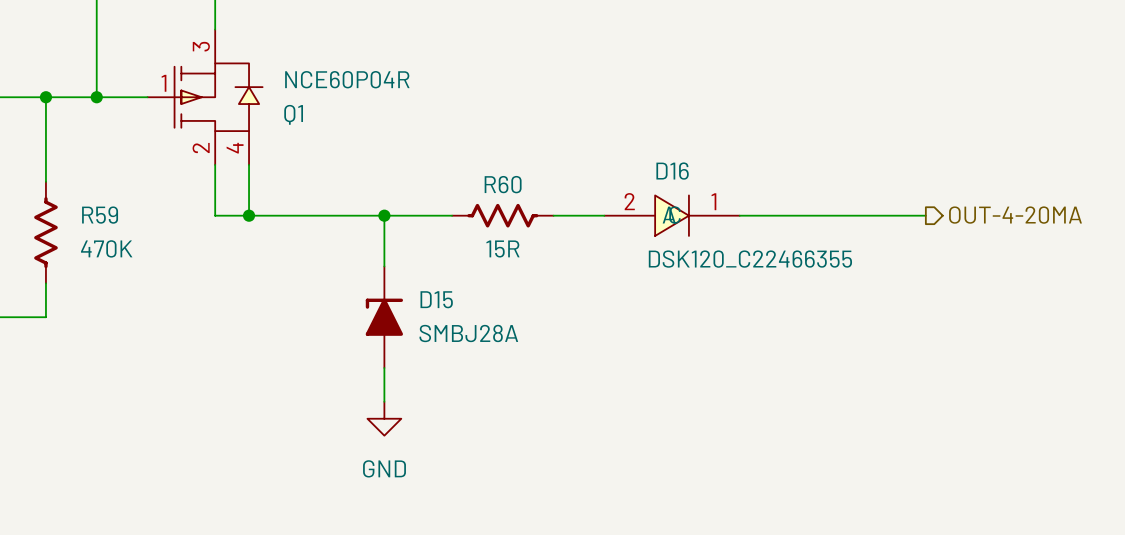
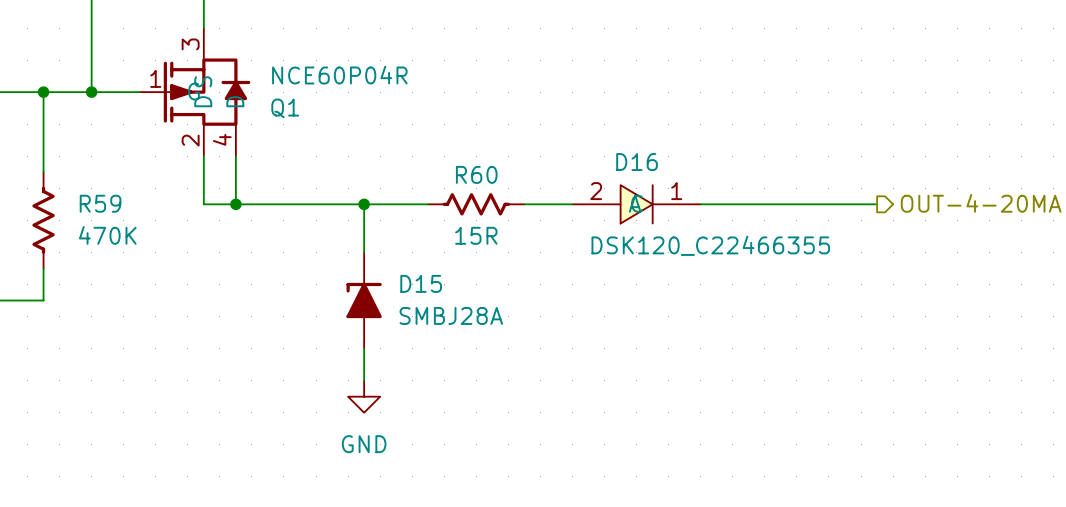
Q1 symbol: [147, 29, 263, 165] -> [139, 28, 251, 157]

